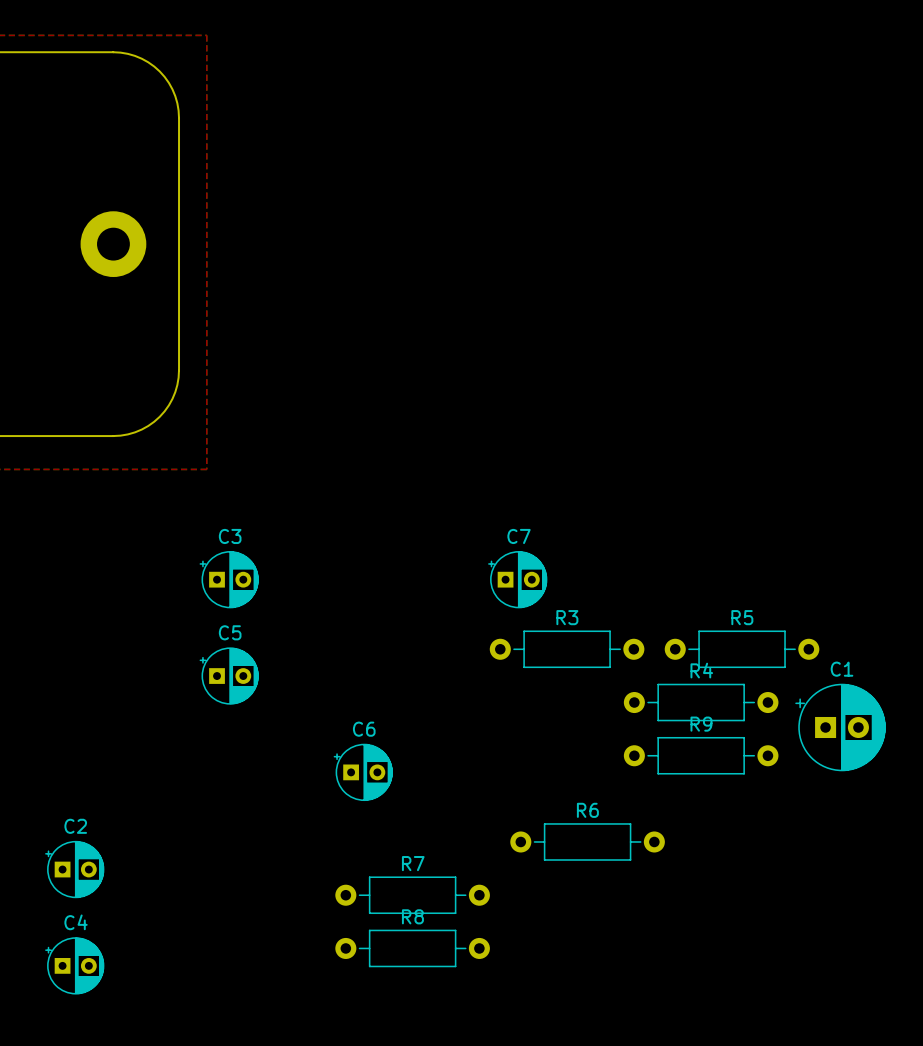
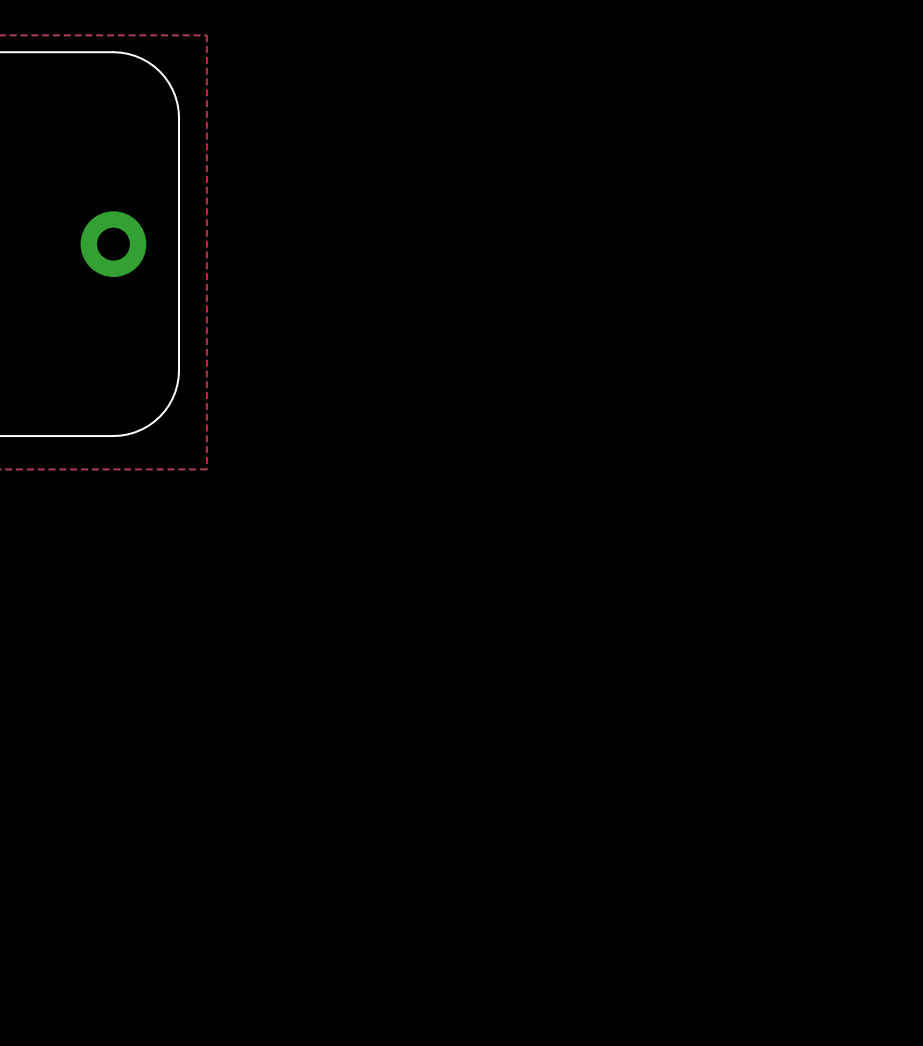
C3: (229, 579) -> none
C7: (517, 579) -> none
R3: (567, 649) -> none
R5: (742, 649) -> none
C5: (229, 676) -> none
R4: (701, 702) -> none
C1: (840, 727) -> none
R9: (701, 755) -> none
C6: (363, 772) -> none
R6: (587, 841) -> none
C2: (74, 869) -> none
R7: (412, 895) -> none
R8: (412, 948) -> none
C4: (74, 965) -> none

